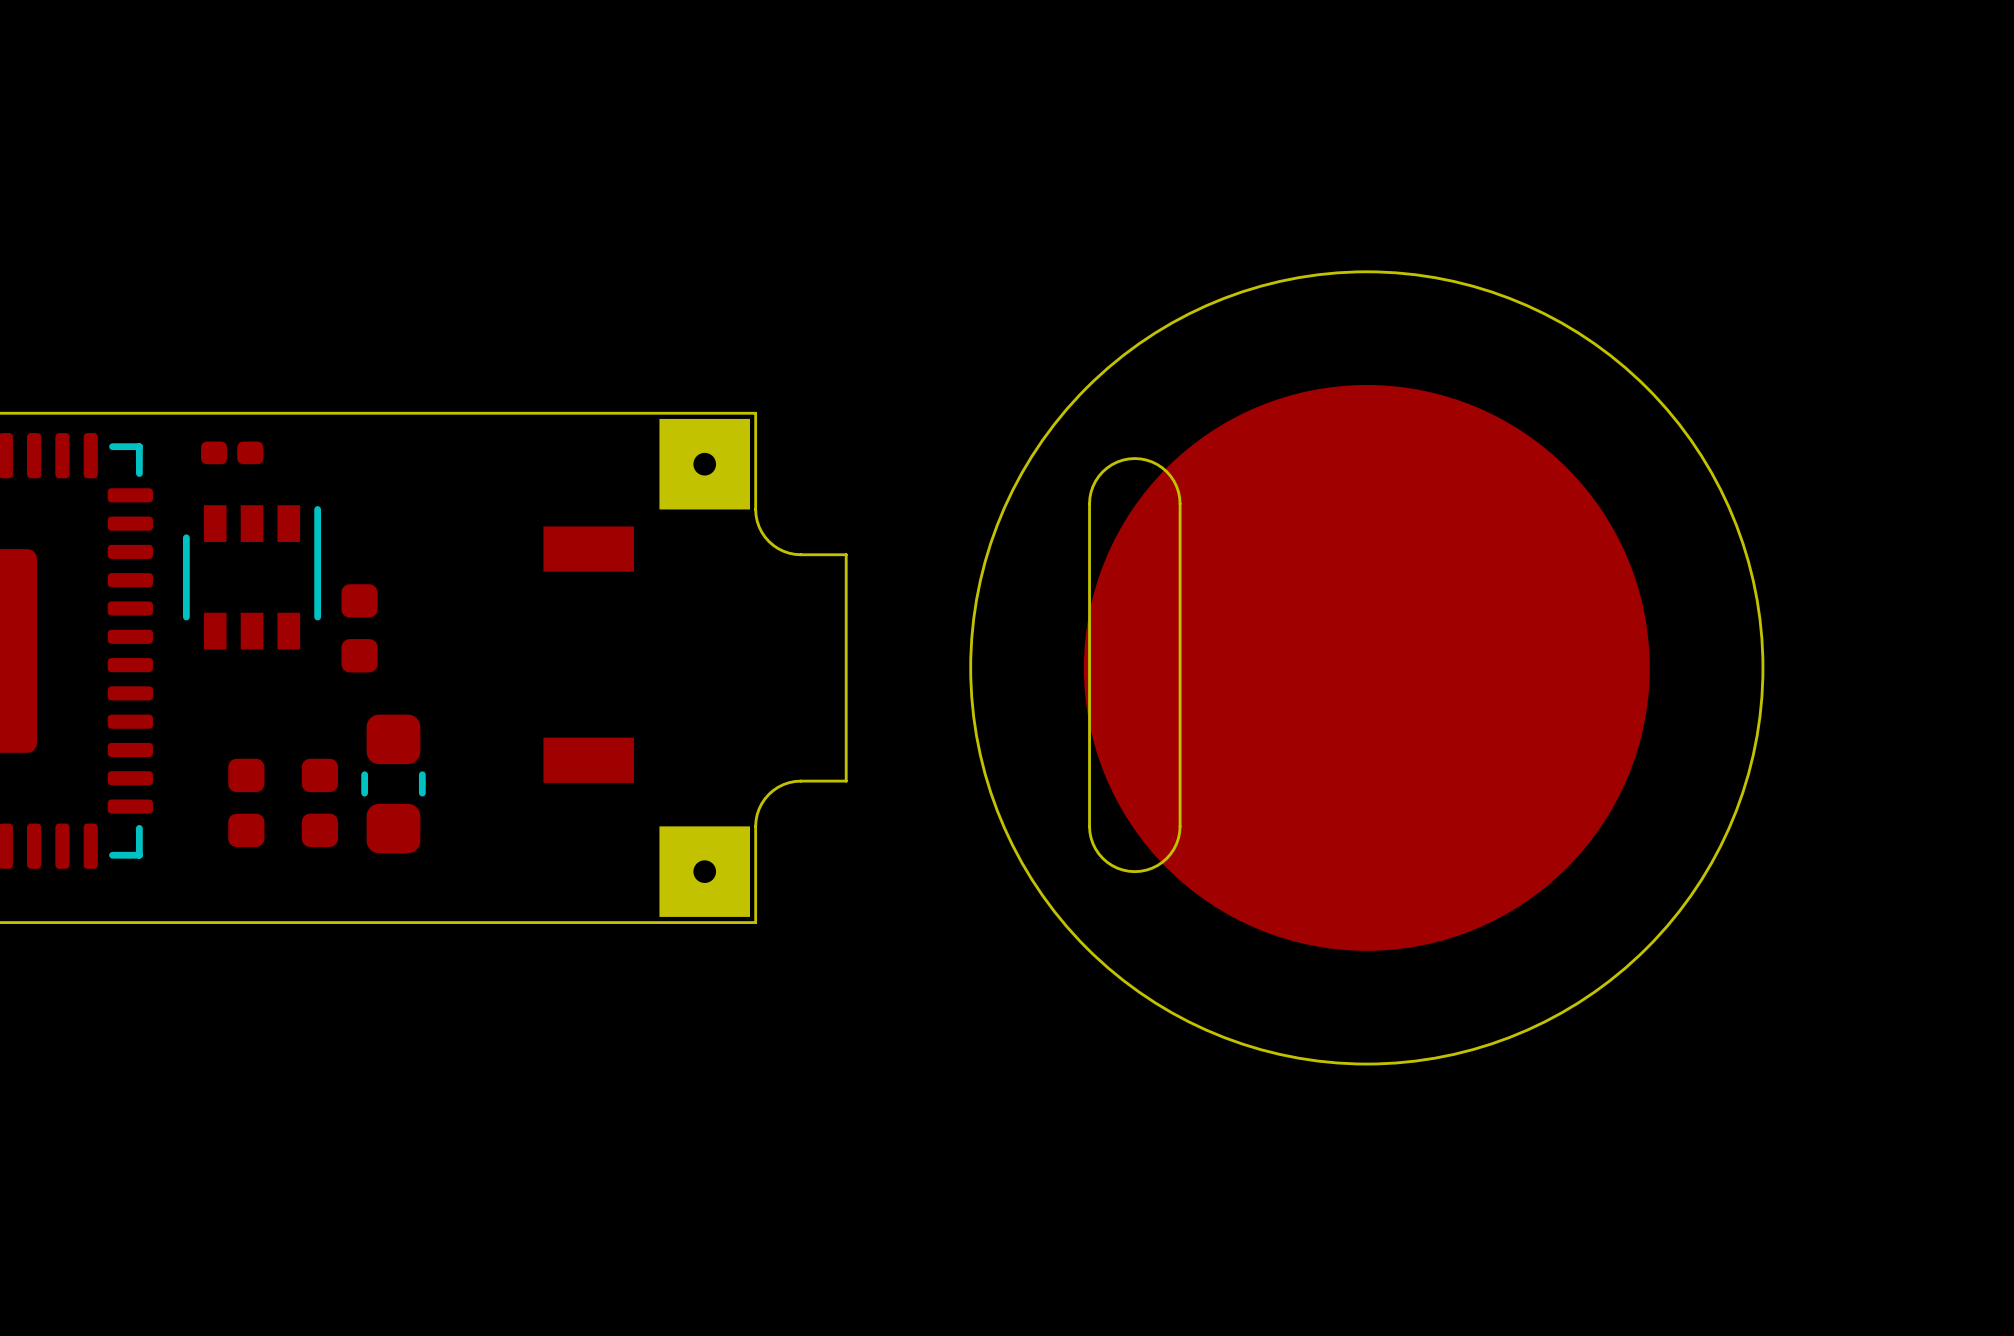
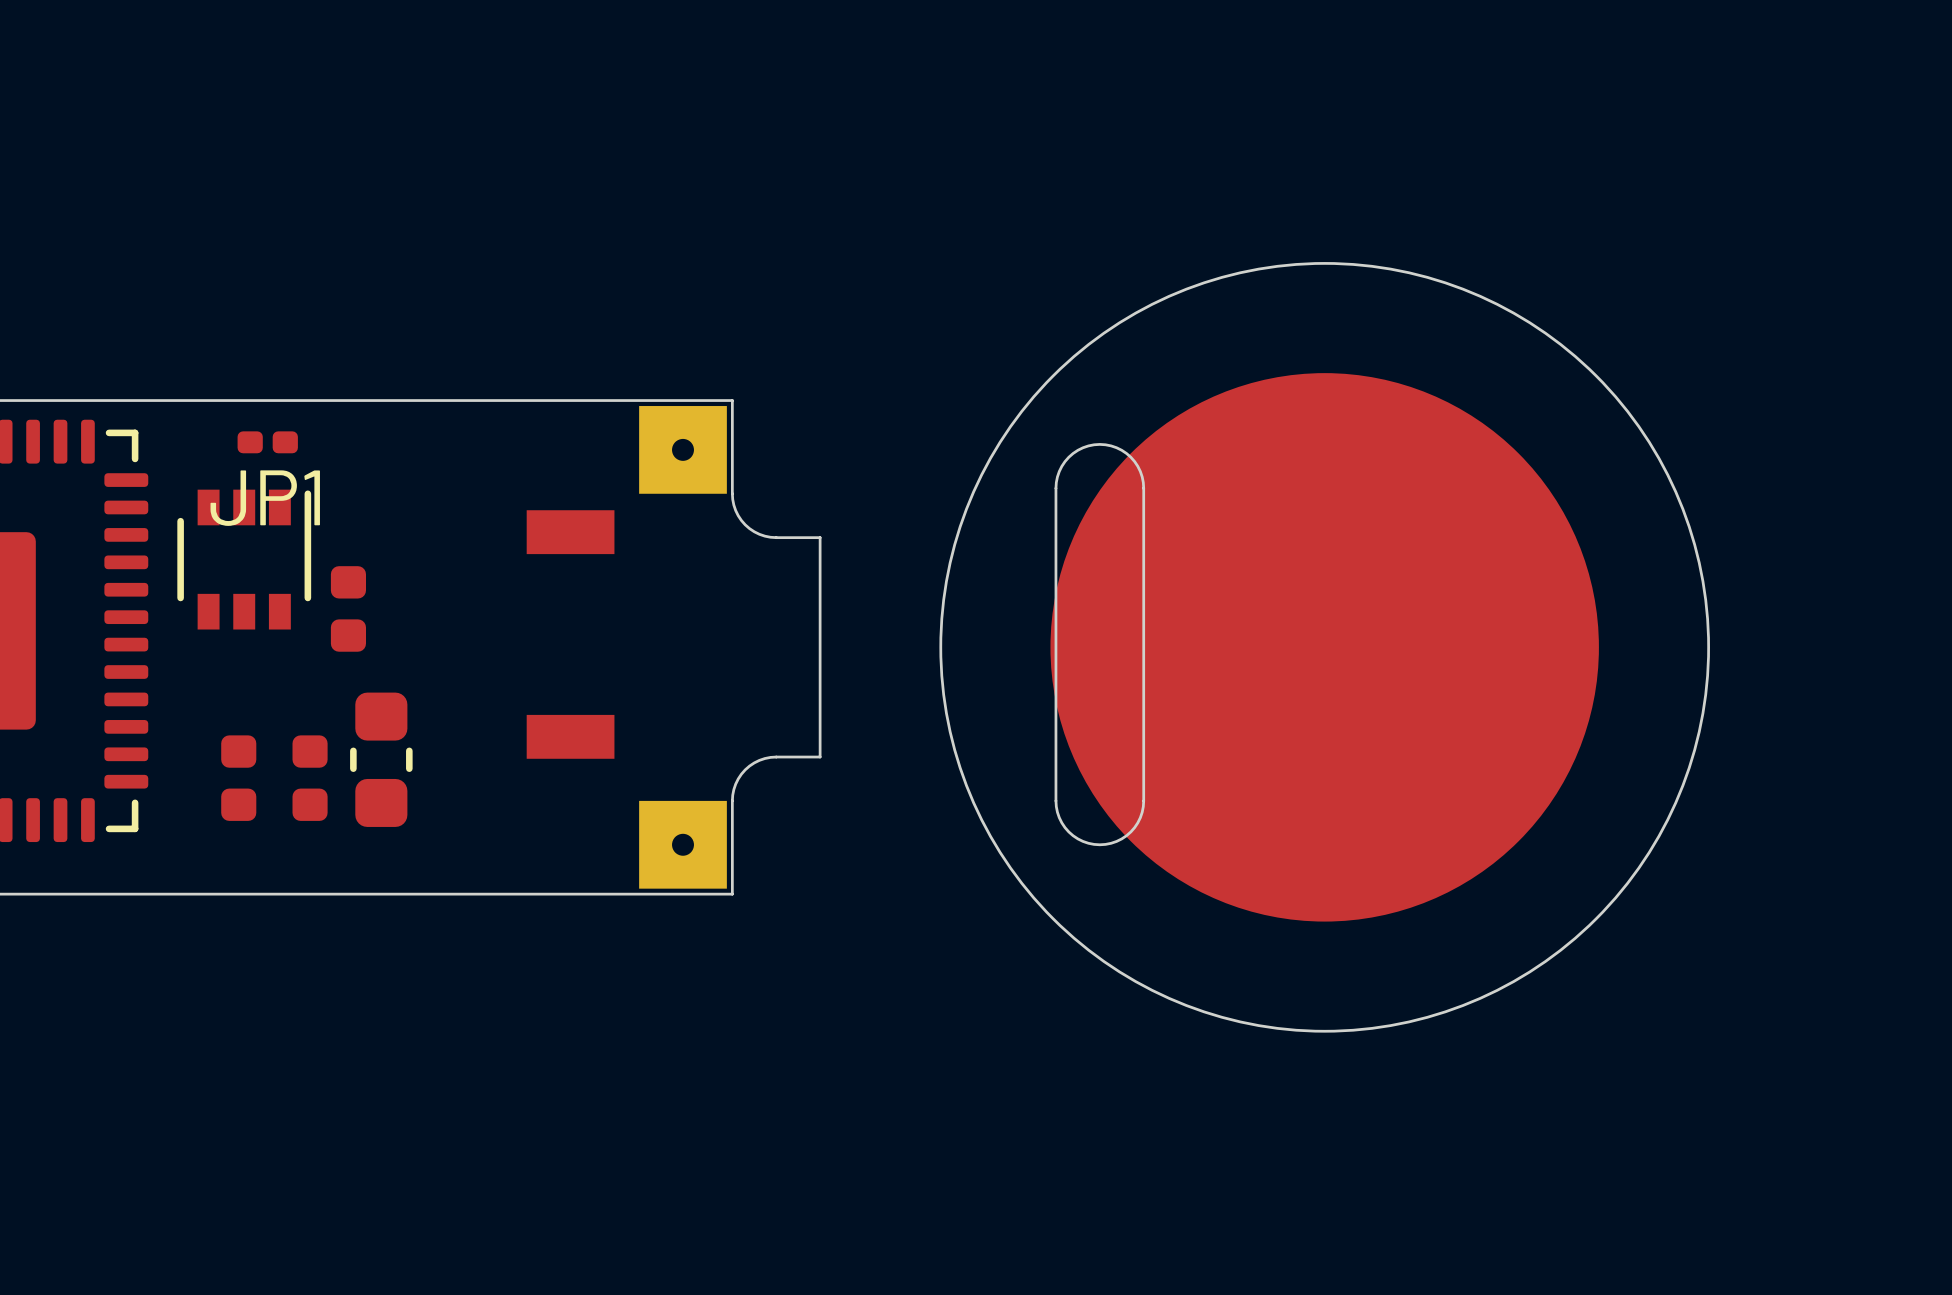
JP1 position: (232, 452) -> (267, 442)
JP1 name: none -> JP1 (265, 498)

